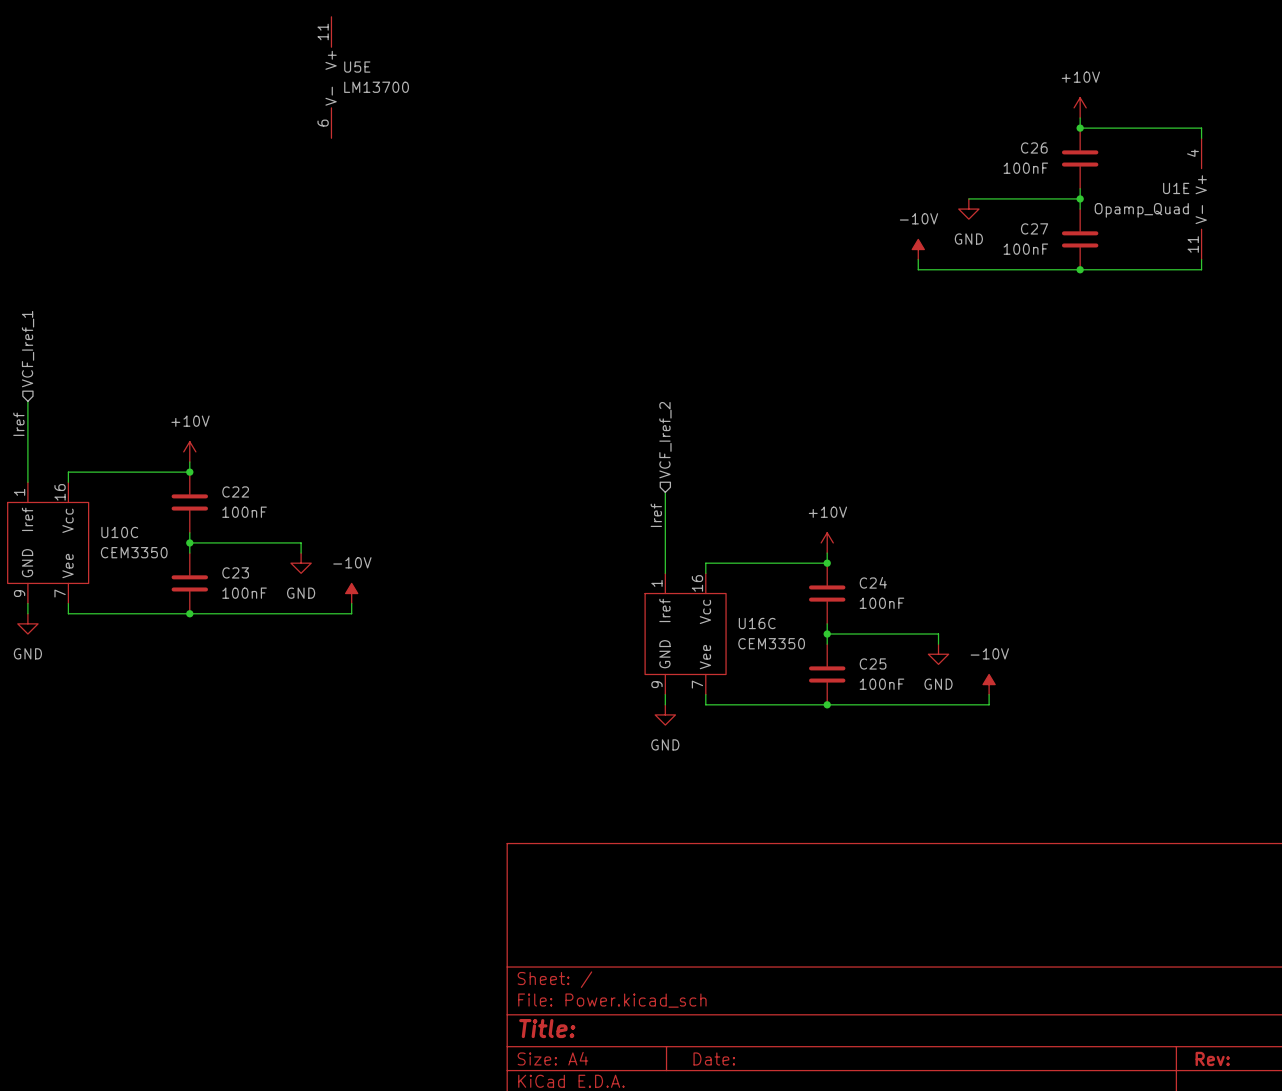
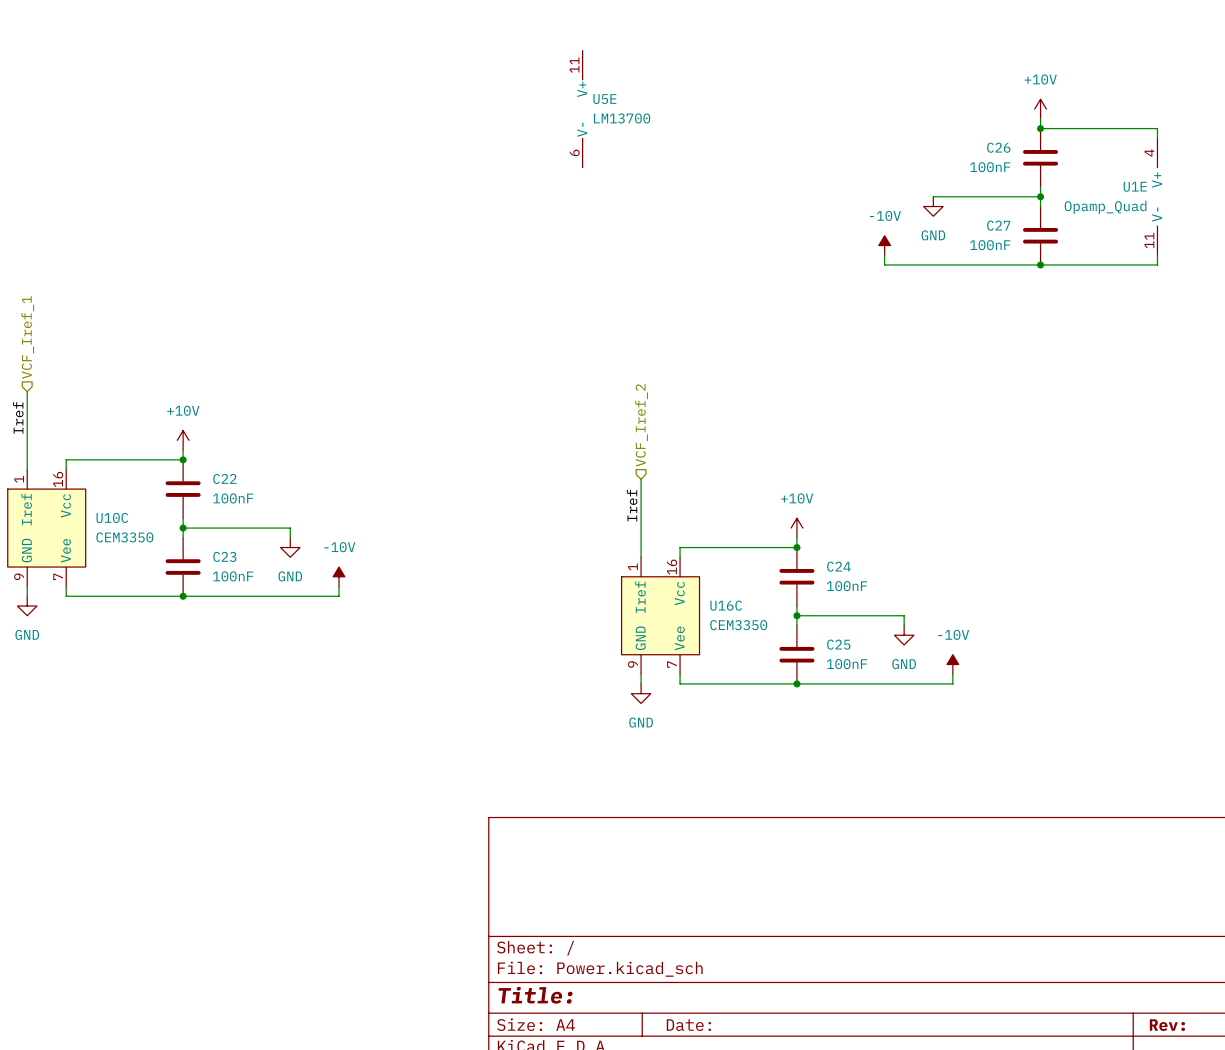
U5E position: (331, 77) -> (582, 109)

